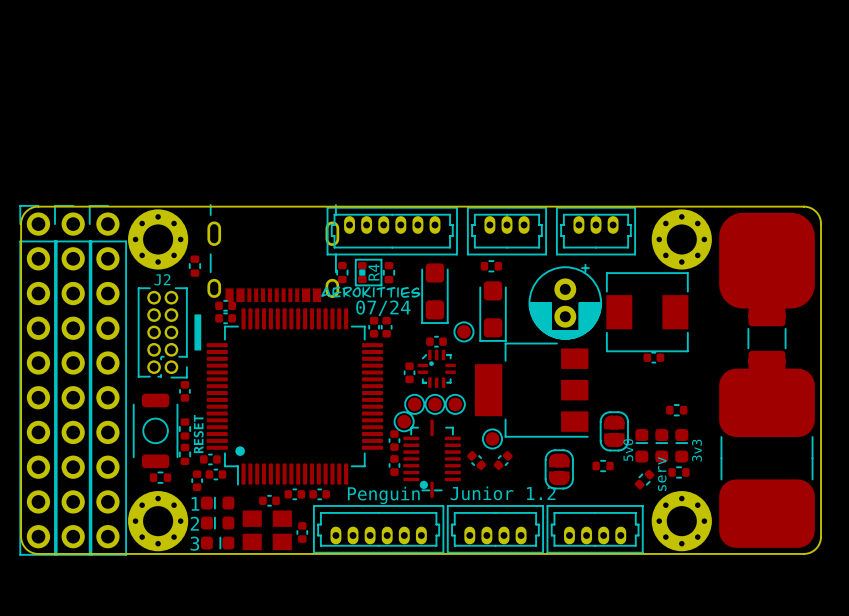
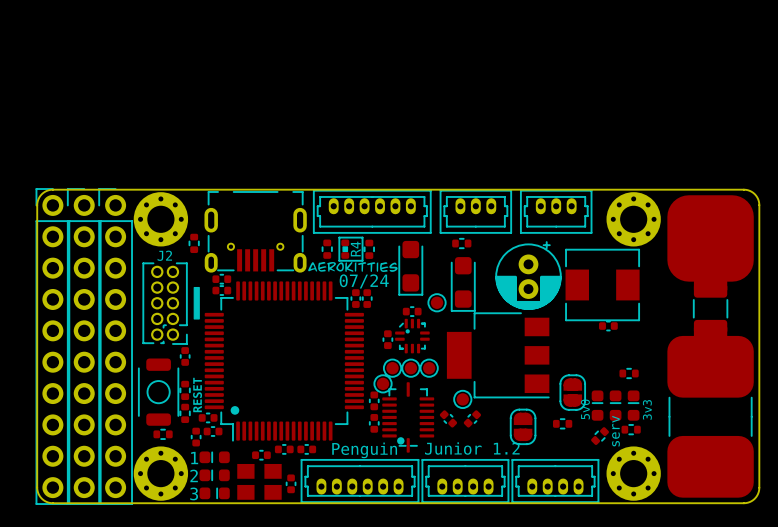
part footprint: [207, 204, 340, 303] -> [204, 191, 307, 273]

